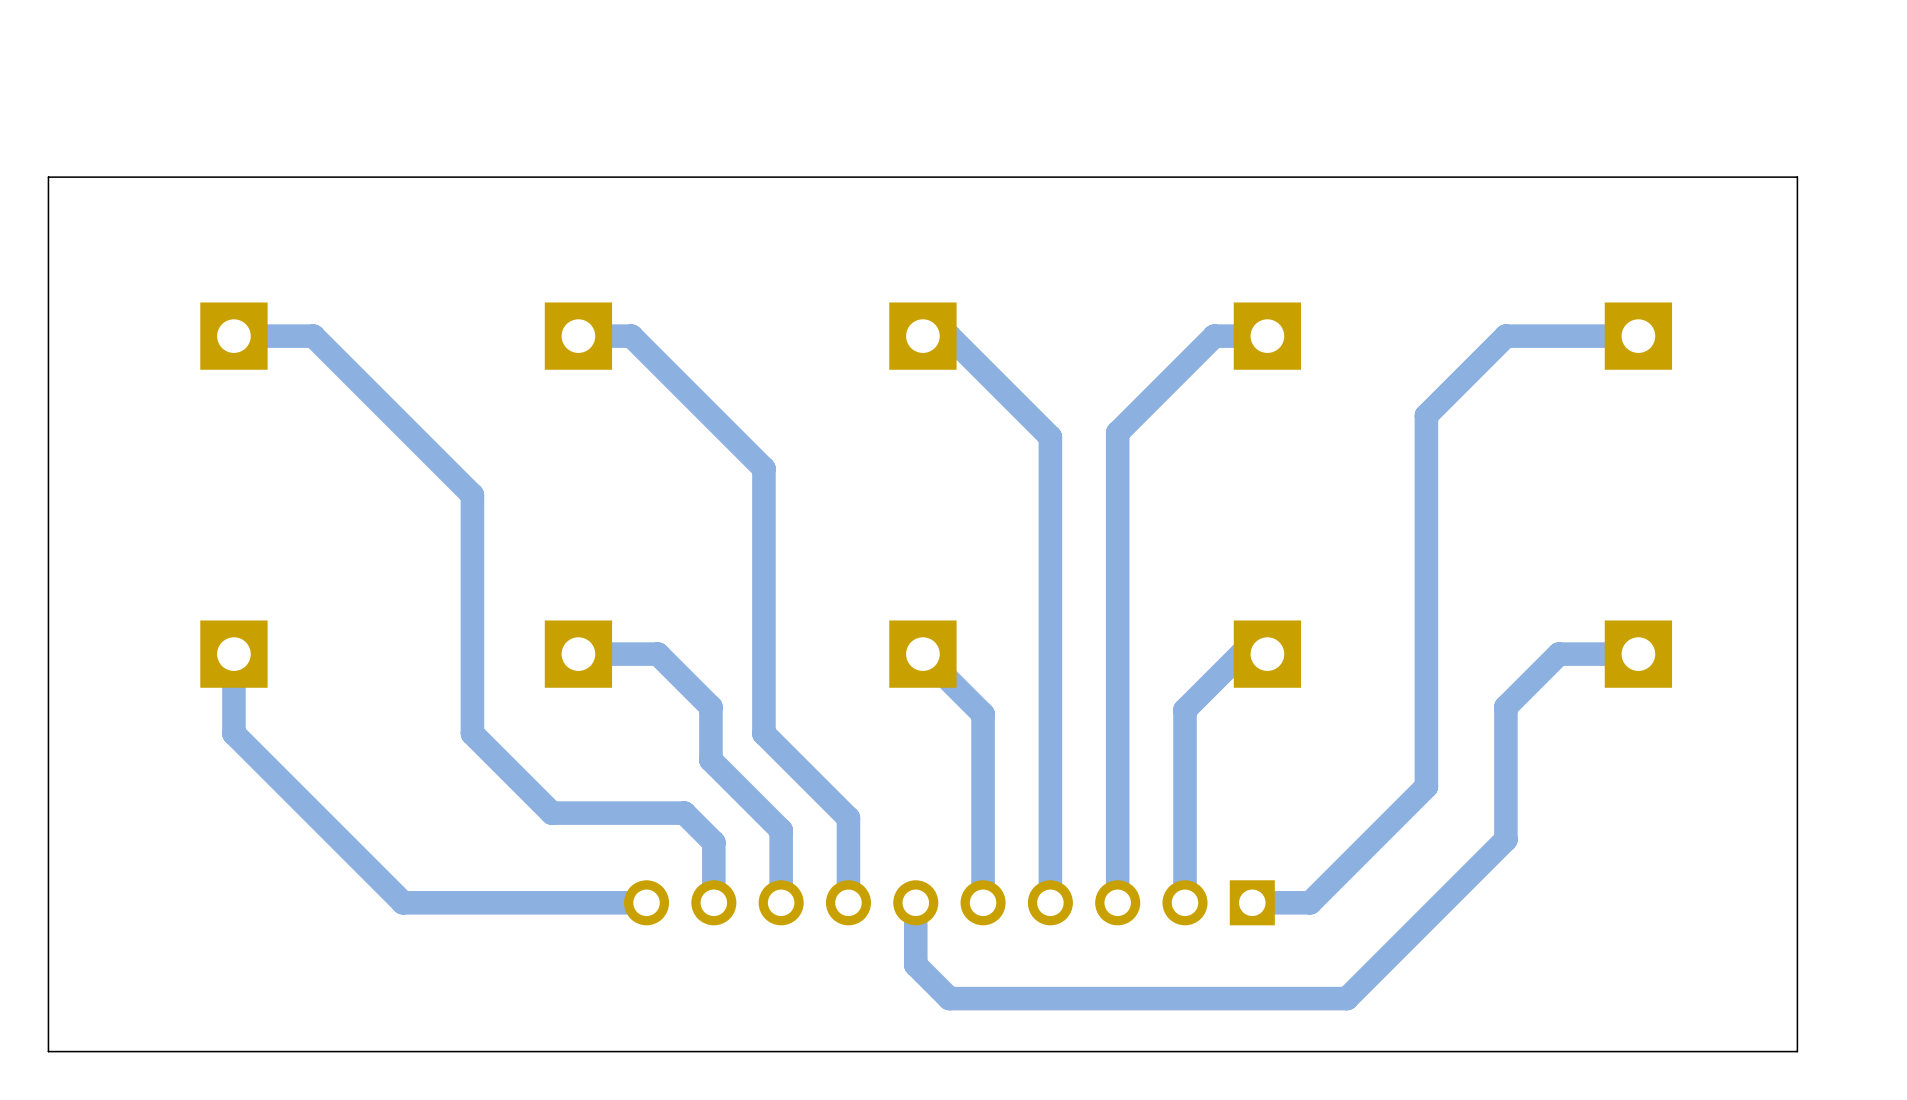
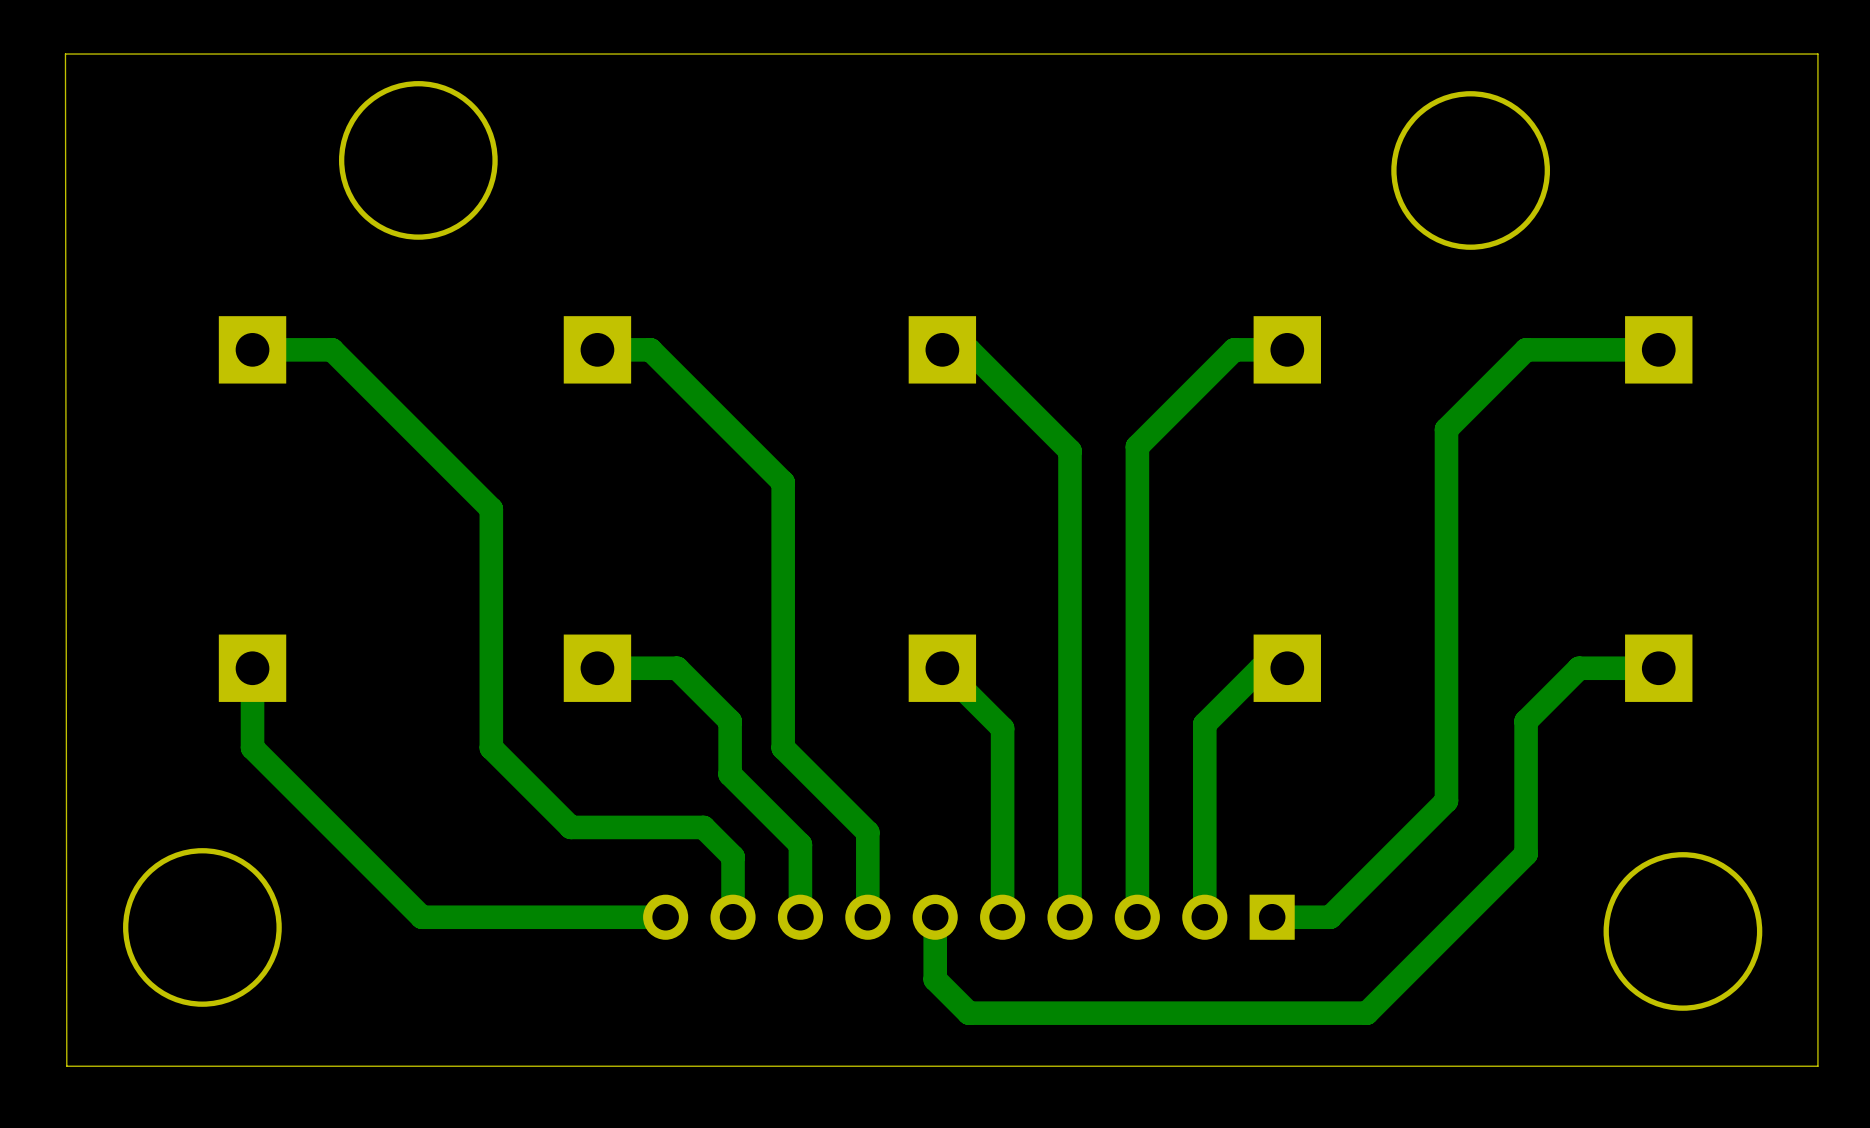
round board edge: none -> [338, 81, 498, 240]
round board edge: none -> [1391, 91, 1551, 250]
board edge: (1797, 177) (48, 177) (48, 1051) -> (1817, 190) (1817, 54) (65, 54) (66, 1066)
round board edge: none -> [123, 848, 282, 1007]
round board edge: none -> [1603, 852, 1763, 1011]

